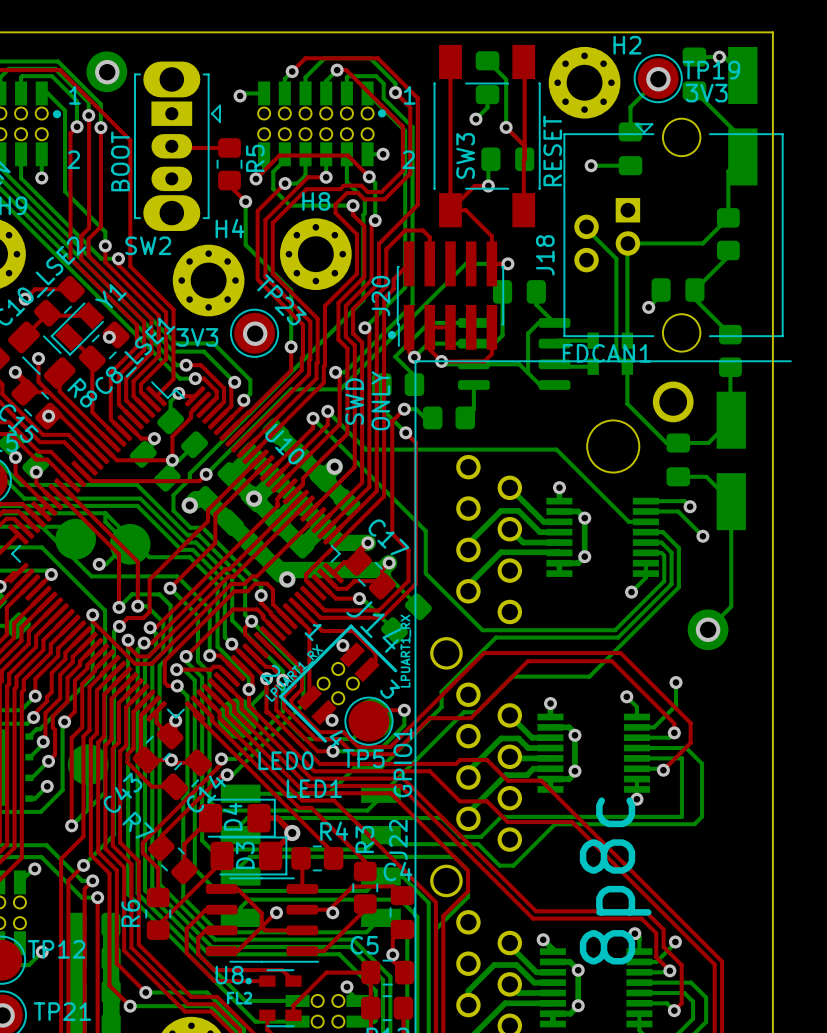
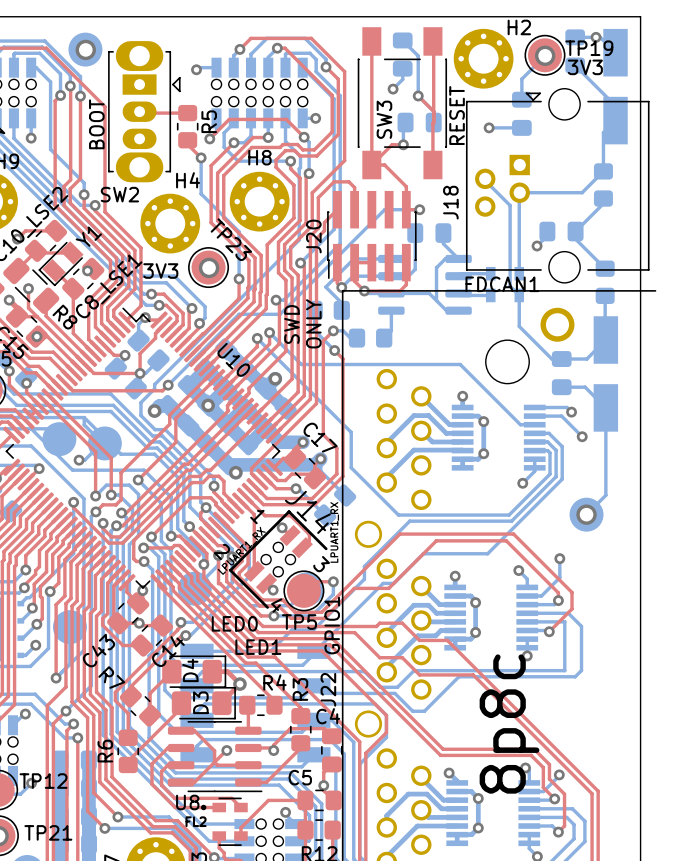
text: 1 (74, 95) -> none
text: 1 (409, 95) -> none
drawing: [377, 109, 387, 118] -> none
drawing: [52, 110, 62, 119] -> none
text: 2 (73, 159) -> none
text: 2 (408, 159) -> none
drawing: [387, 330, 396, 340] -> none

